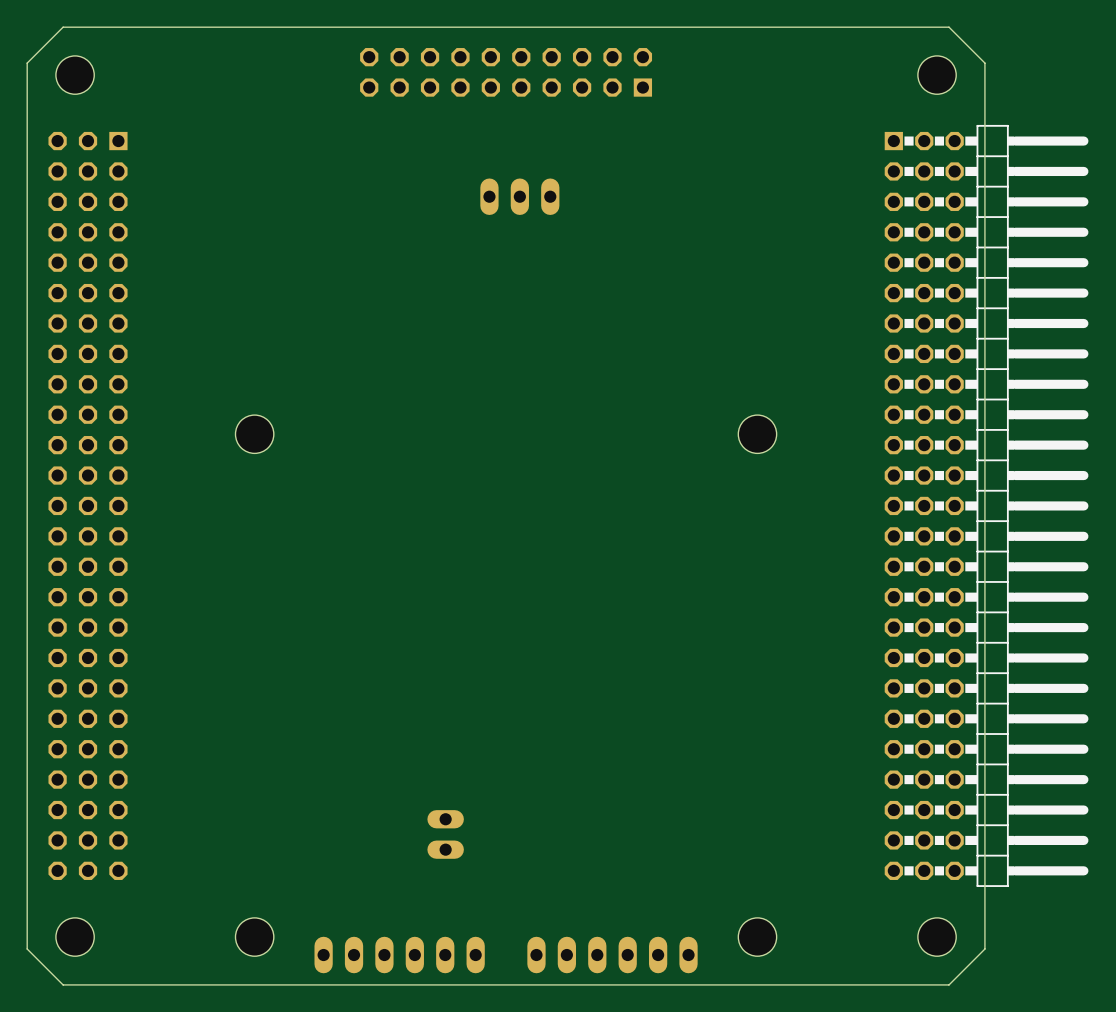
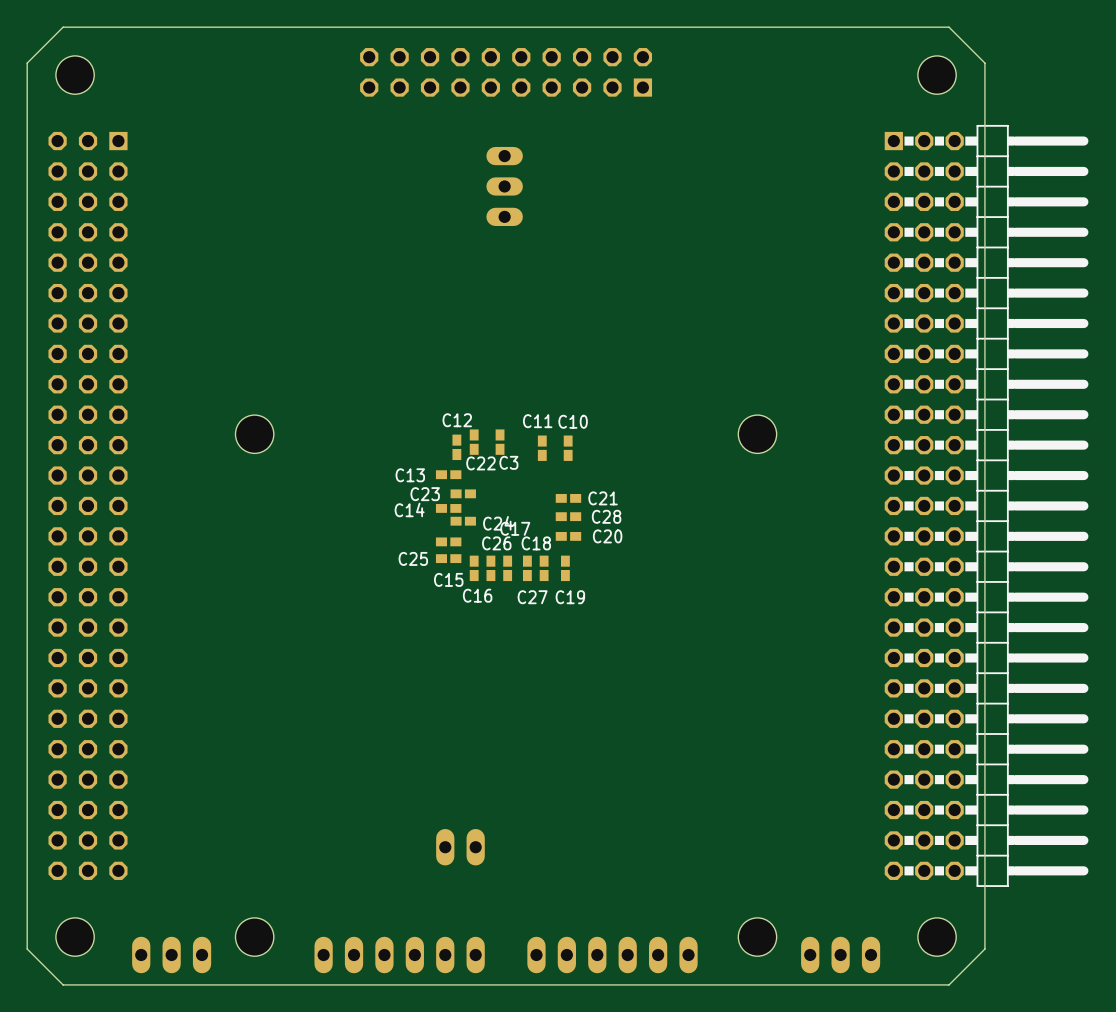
part rotation: 0° (519, 196) -> 90° clockwise (504, 186)
C22: none -> (474, 442)
C3: none -> (500, 442)
C12: none -> (456, 447)
C11: none -> (542, 448)
C10: none -> (568, 448)
C13: none -> (448, 474)
C23: none -> (463, 493)
C21: none -> (568, 498)
C14: none -> (448, 508)
C28: none -> (568, 516)
C24: none -> (463, 521)
C20: none -> (568, 536)
C15: none -> (448, 541)
C25: none -> (448, 558)
C16: none -> (474, 568)
C26: none -> (490, 568)
C17: none -> (507, 568)
C27: none -> (527, 568)
C18: none -> (544, 568)
C19: none -> (565, 568)
part rotation: 0° (445, 834) -> 90° clockwise (460, 847)
part: none -> (171, 954)
part: none -> (840, 954)

